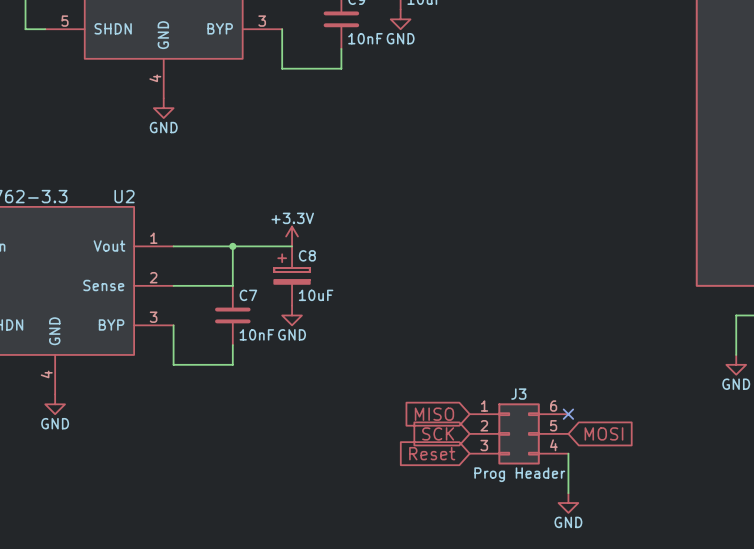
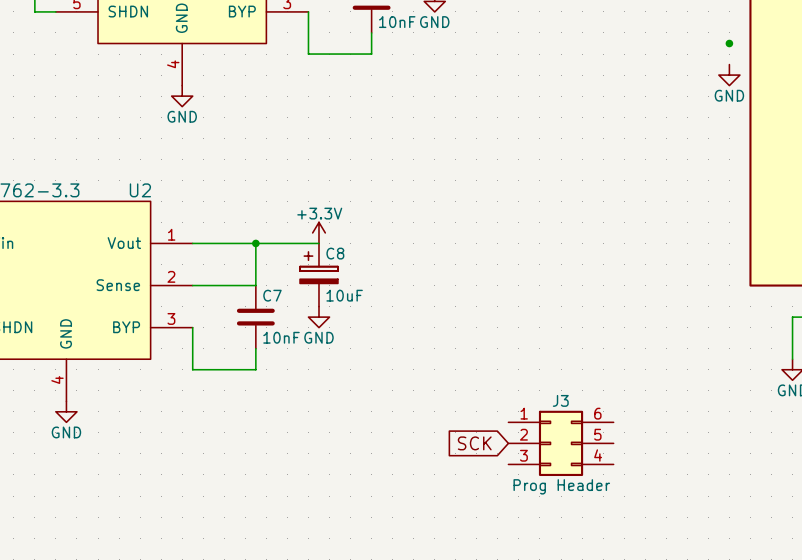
junction: none -> (729, 43)
power symbol: none -> GND (729, 75)
global label: MISO (434, 414) -> none
no-connect mark: (568, 414) -> none
global label: MOSI (603, 433) -> none
global label: Reset (432, 453) -> none
wire: (568, 453) (568, 493) -> none
power symbol: GND (568, 503) -> none

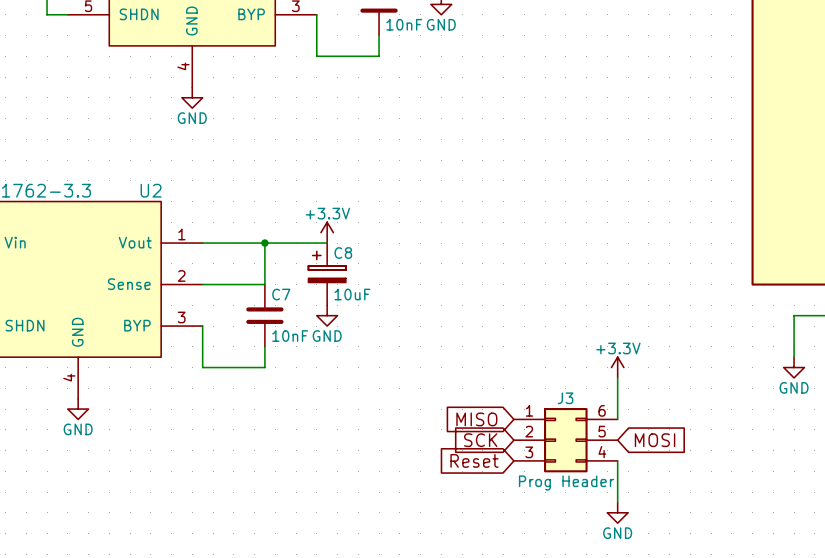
junction: (729, 43) -> none
power symbol: GND (729, 75) -> none
power symbol: none -> +3.3V (617, 367)
wire: none -> (617, 377) (617, 419)
global label: none -> MISO (476, 419)
global label: none -> MOSI (655, 440)
global label: none -> Reset (474, 460)
wire: none -> (617, 460) (617, 502)
power symbol: none -> GND (617, 512)

